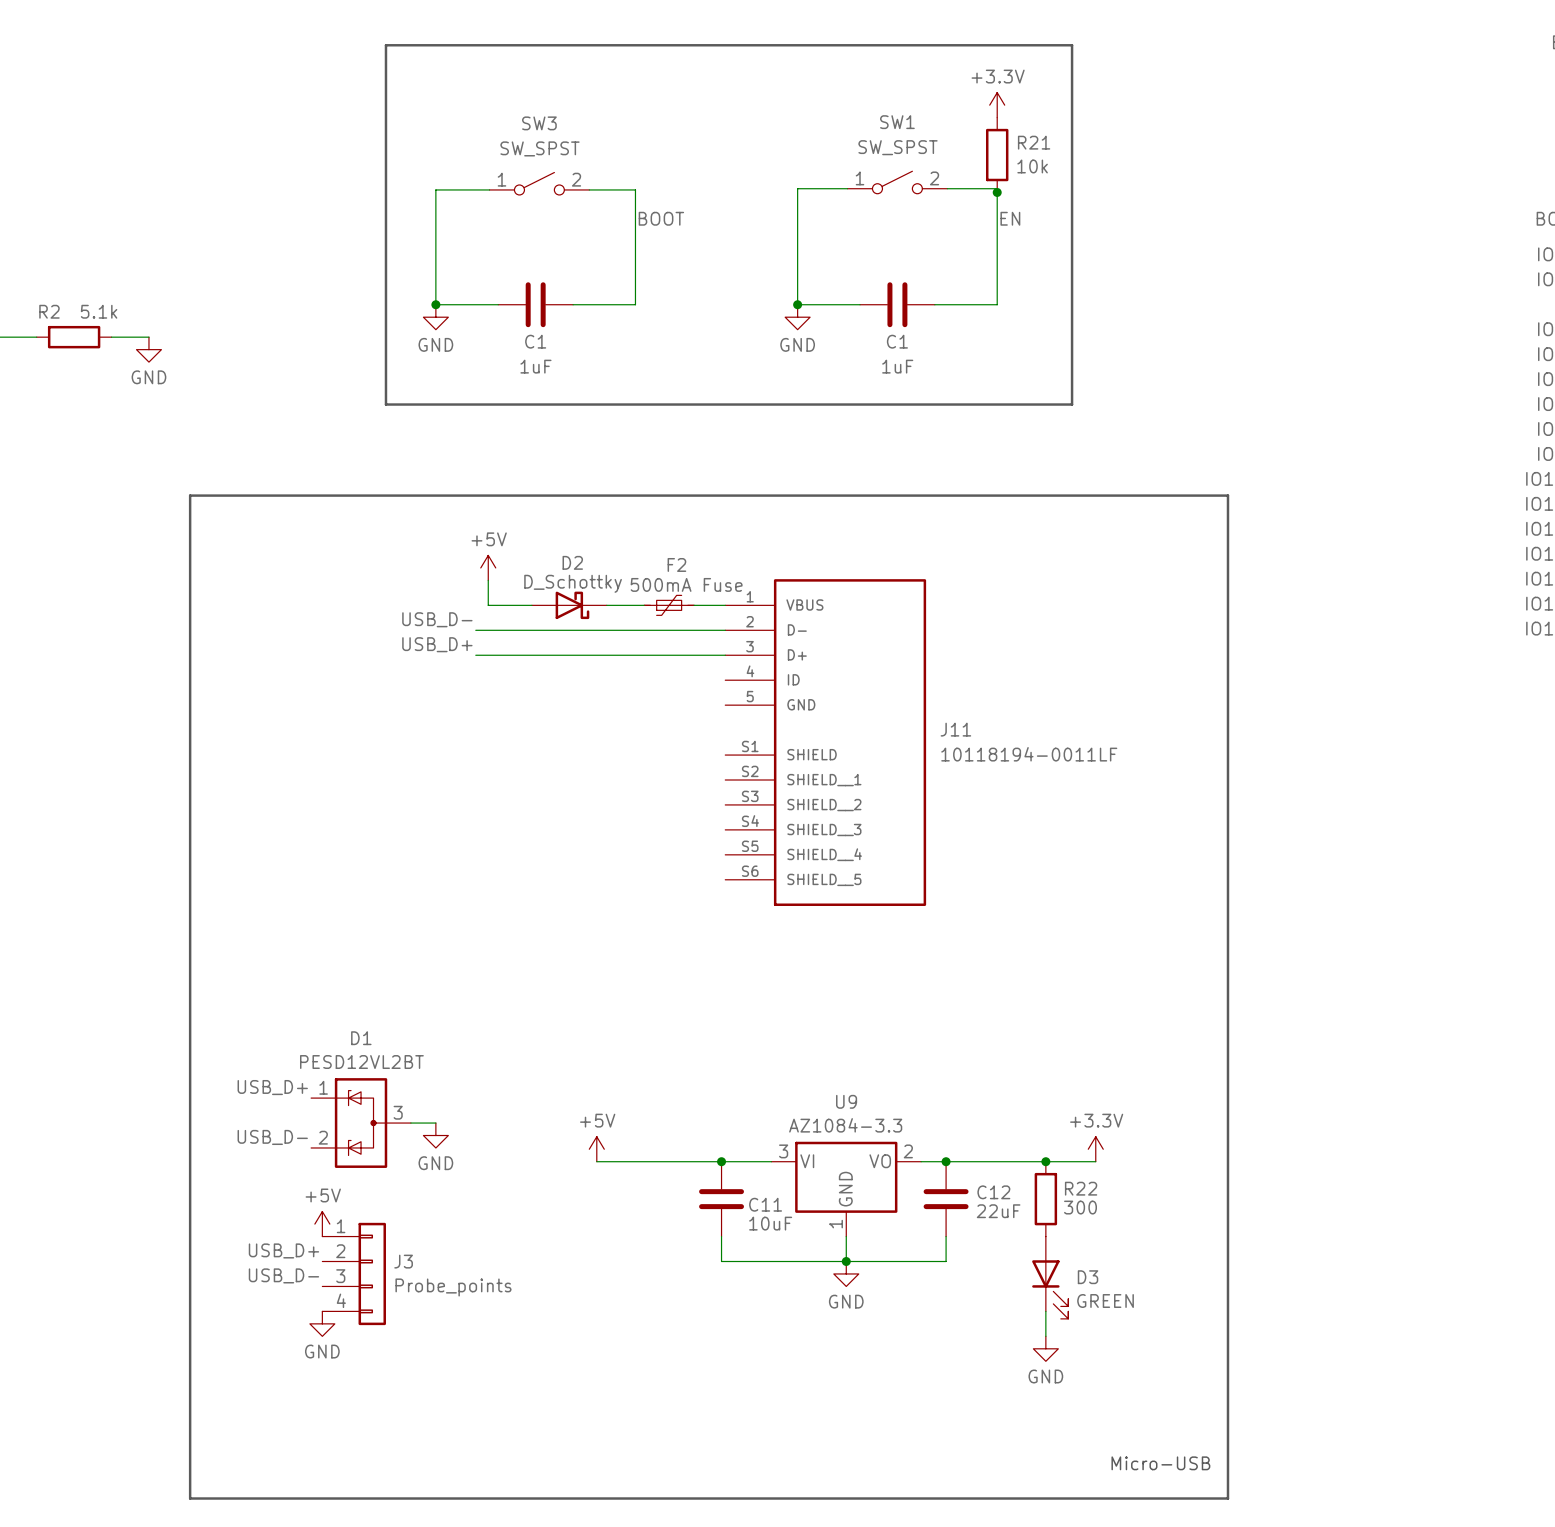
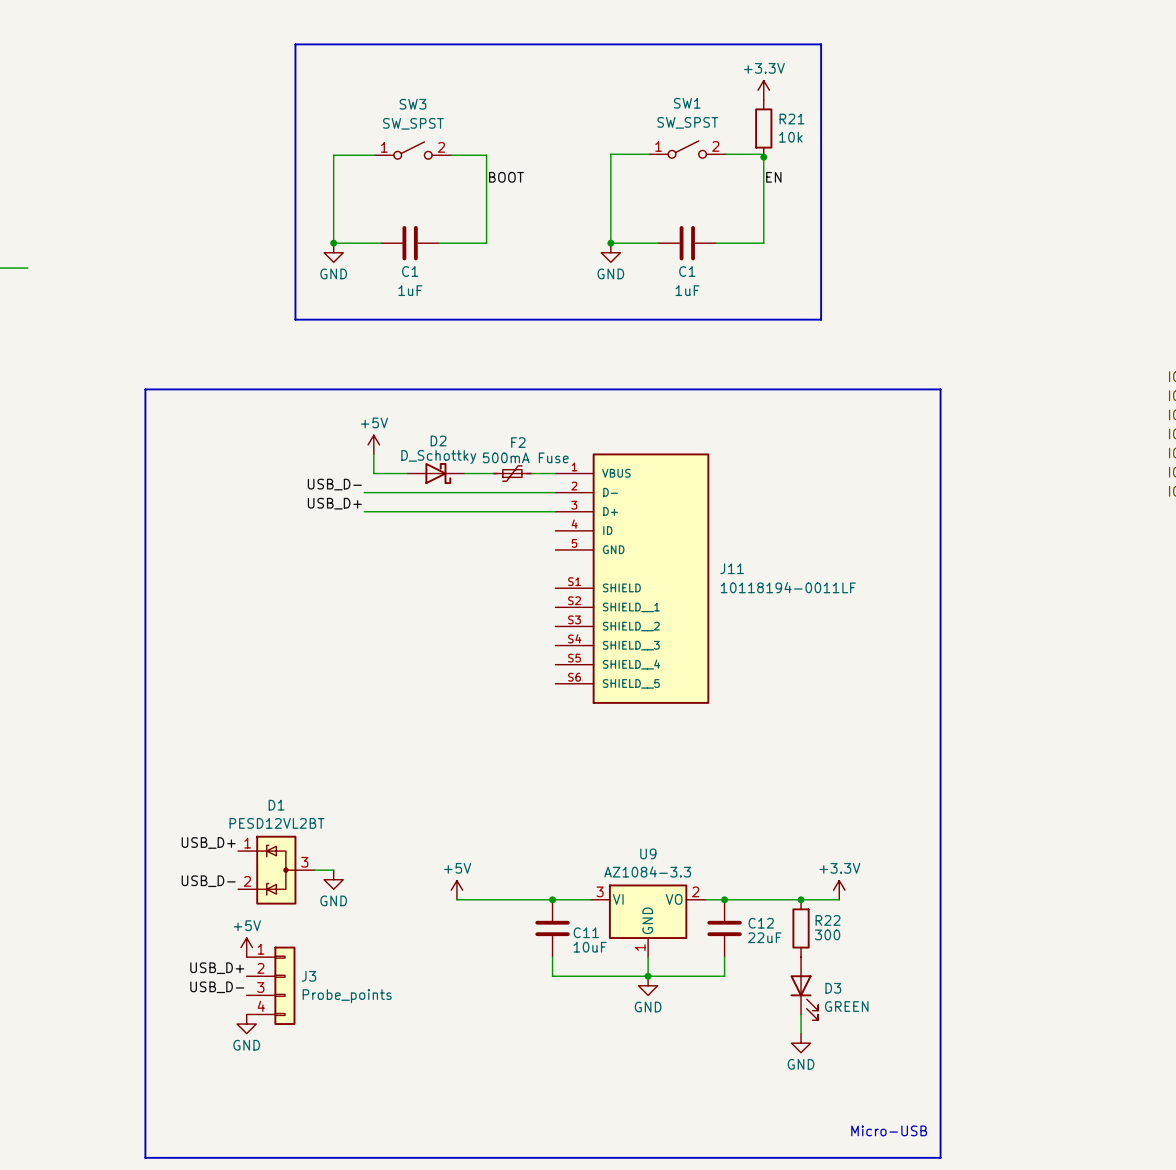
R2: 5.1k (74, 337) -> none
wire: (111, 337) (148, 337) -> none
power symbol: GND (148, 349) -> none

